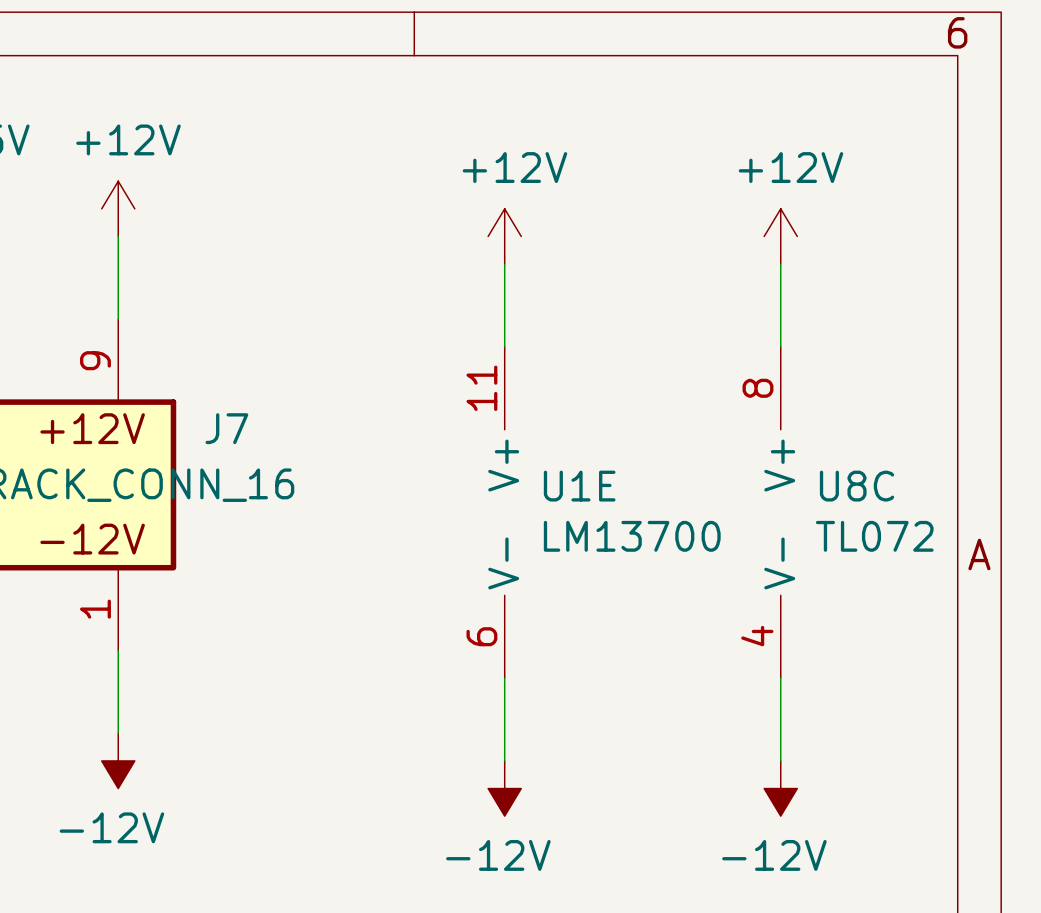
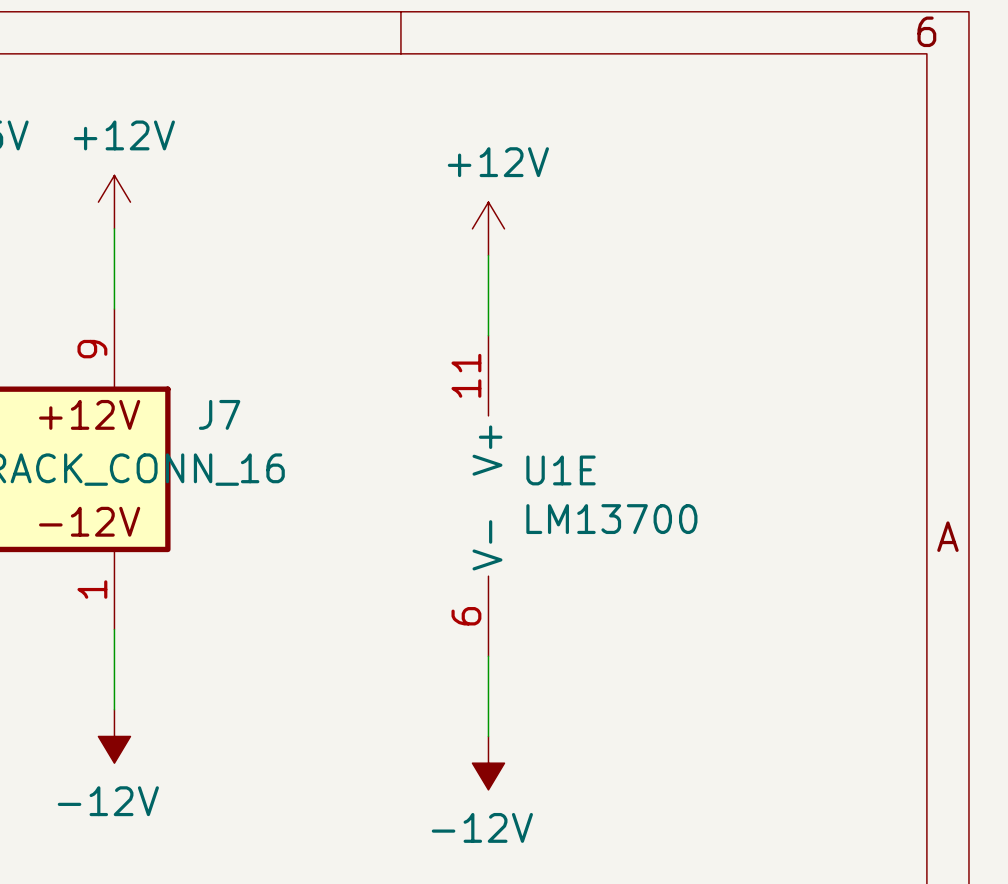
power symbol: +12V (780, 236) -> none
wire: (780, 264) (780, 346) -> none
U8C: TL072 (780, 512) -> none
wire: (780, 678) (780, 760) -> none
power symbol: -12V (780, 788) -> none

